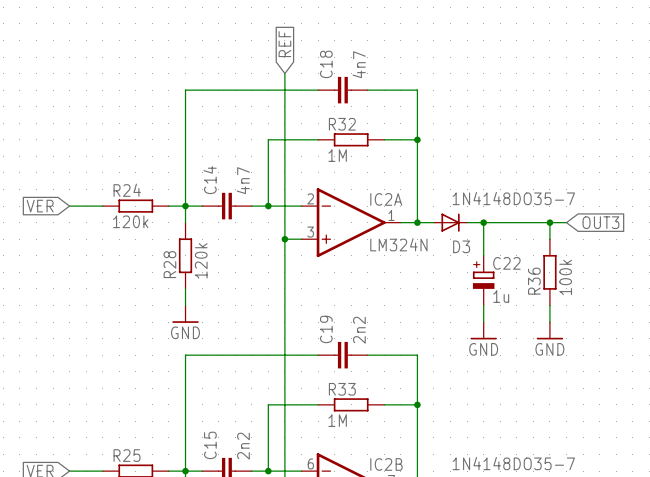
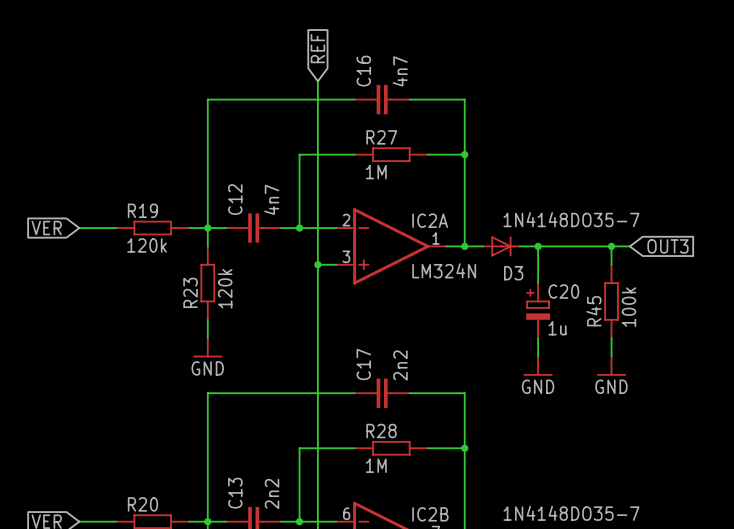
C18 name: C18 (326, 64) -> C16 (363, 71)
R32 name: R32 (342, 124) -> R27 (381, 137)
C14 name: C14 (210, 180) -> C12 (235, 199)
R24 name: R24 (127, 190) -> R19 (142, 210)
C22 name: C22 (506, 263) -> C20 (563, 291)
R28 name: R28 (169, 264) -> R23 (190, 292)
R36 name: R36 (534, 281) -> R45 (593, 311)
C19 name: C19 (326, 329) -> C17 (363, 364)
R33 name: R33 (342, 389) -> R28 (381, 431)
C15 name: C15 (210, 445) -> C13 (235, 493)
R25 name: R25 (126, 455) -> R20 (142, 504)

